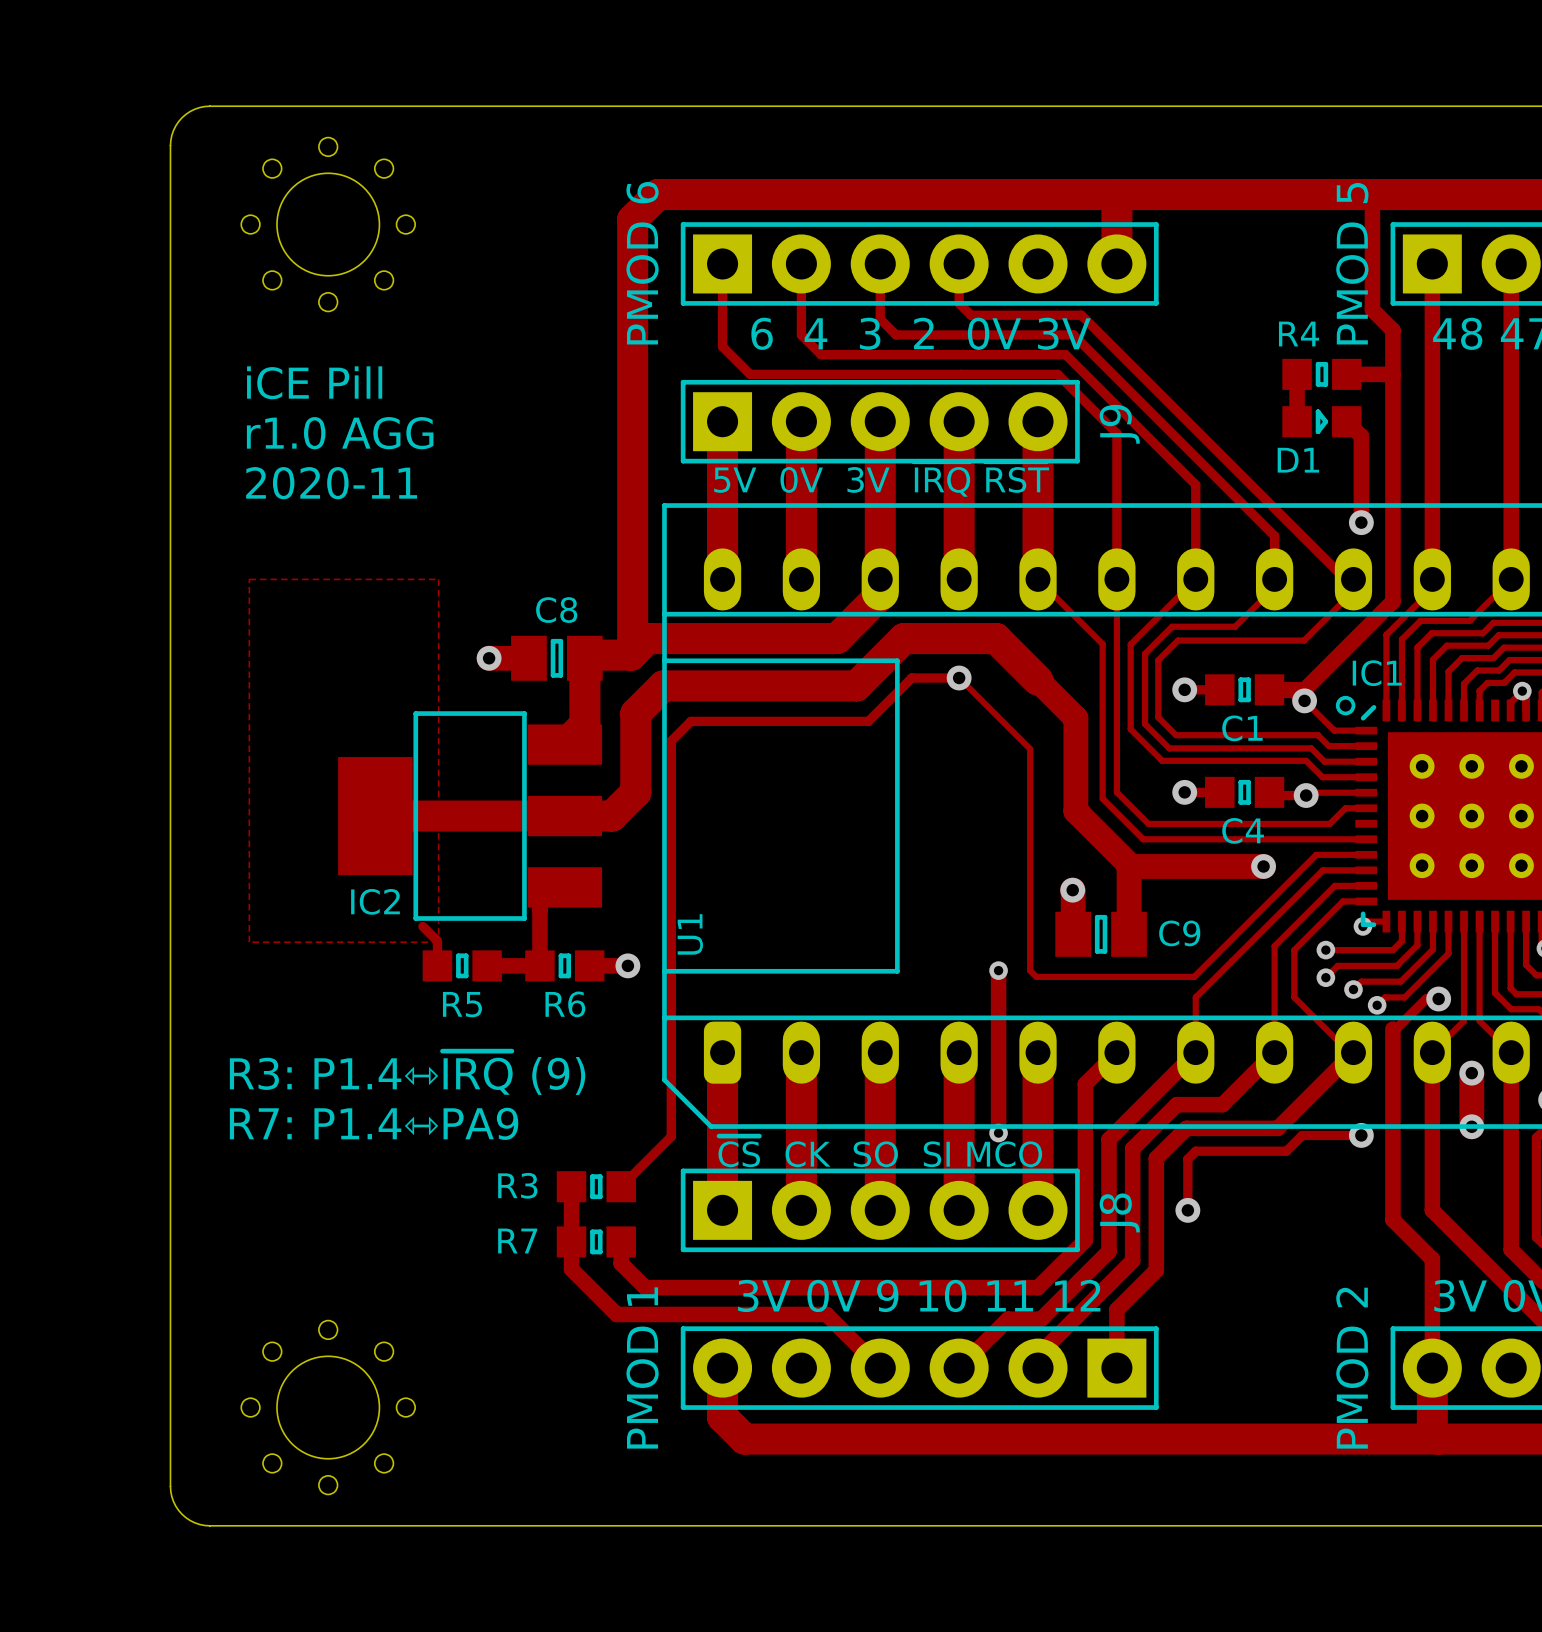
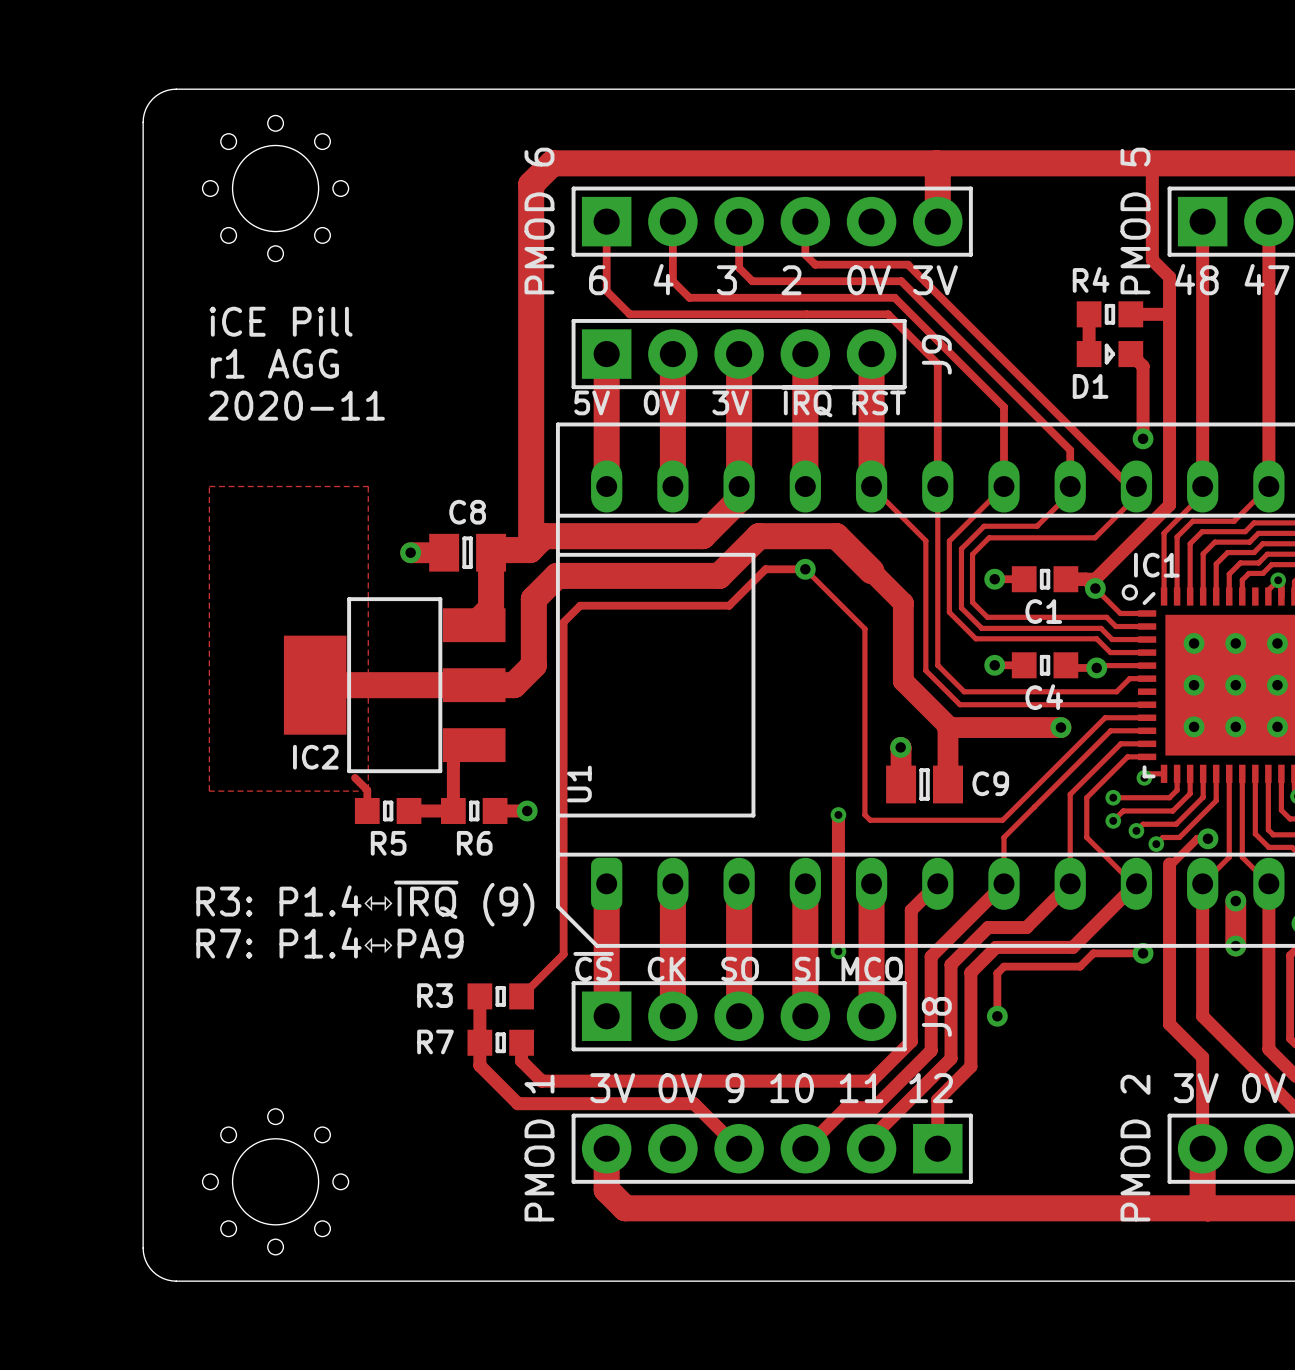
text: r1.0 AGG (340, 433) -> r1 AGG (274, 363)

